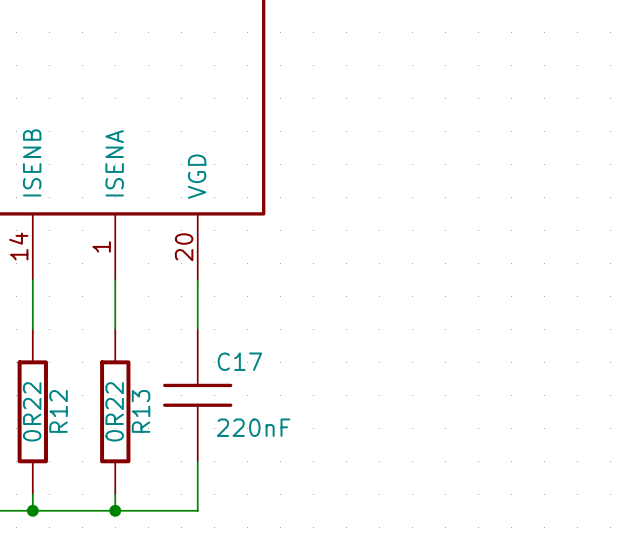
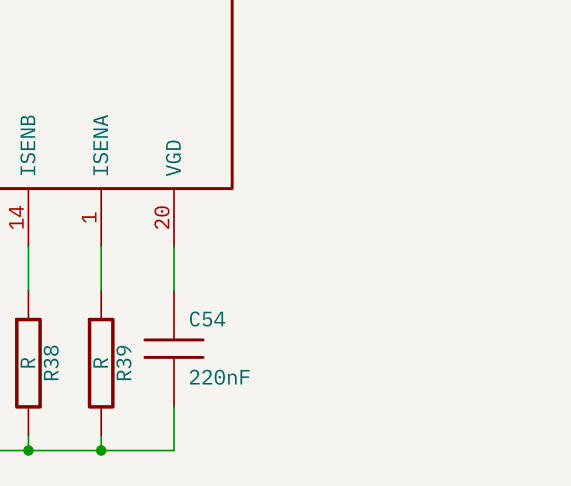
C17 name: C17 (239, 361) -> C54 (207, 319)
R12 value: 0R22 (32, 411) -> R (27, 362)
R12 name: R12 (58, 411) -> R38 (51, 362)
R13 value: 0R22 (114, 411) -> R (100, 362)
R13 name: R13 (141, 411) -> R39 (123, 362)

